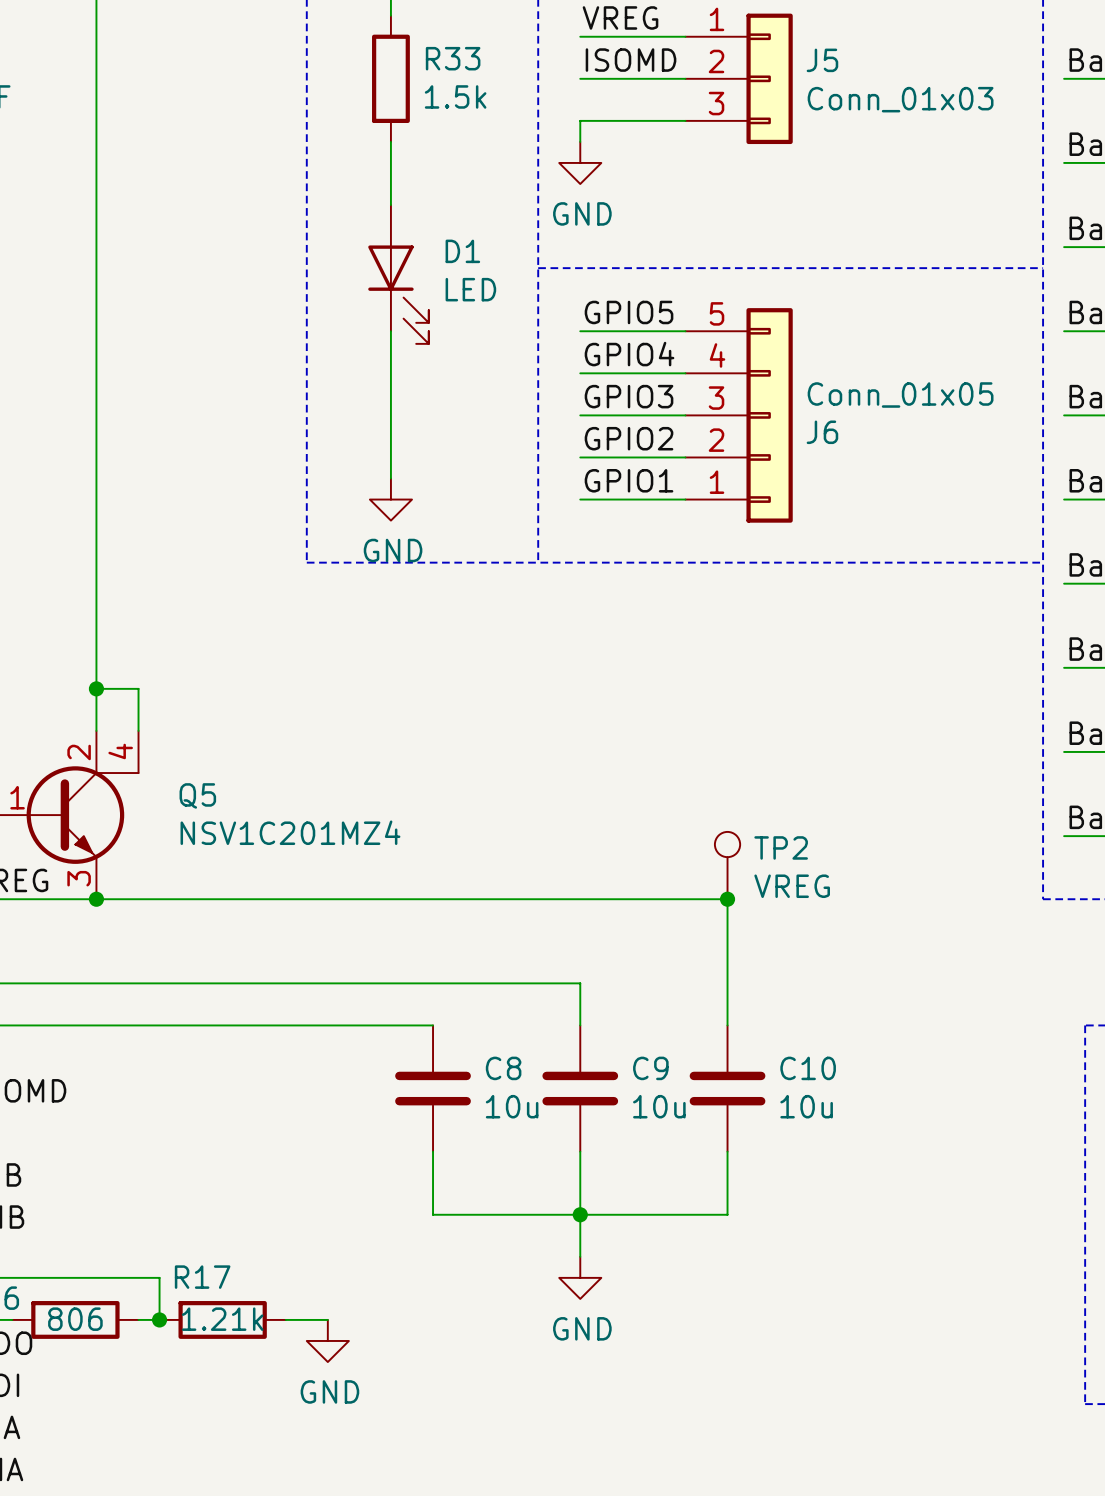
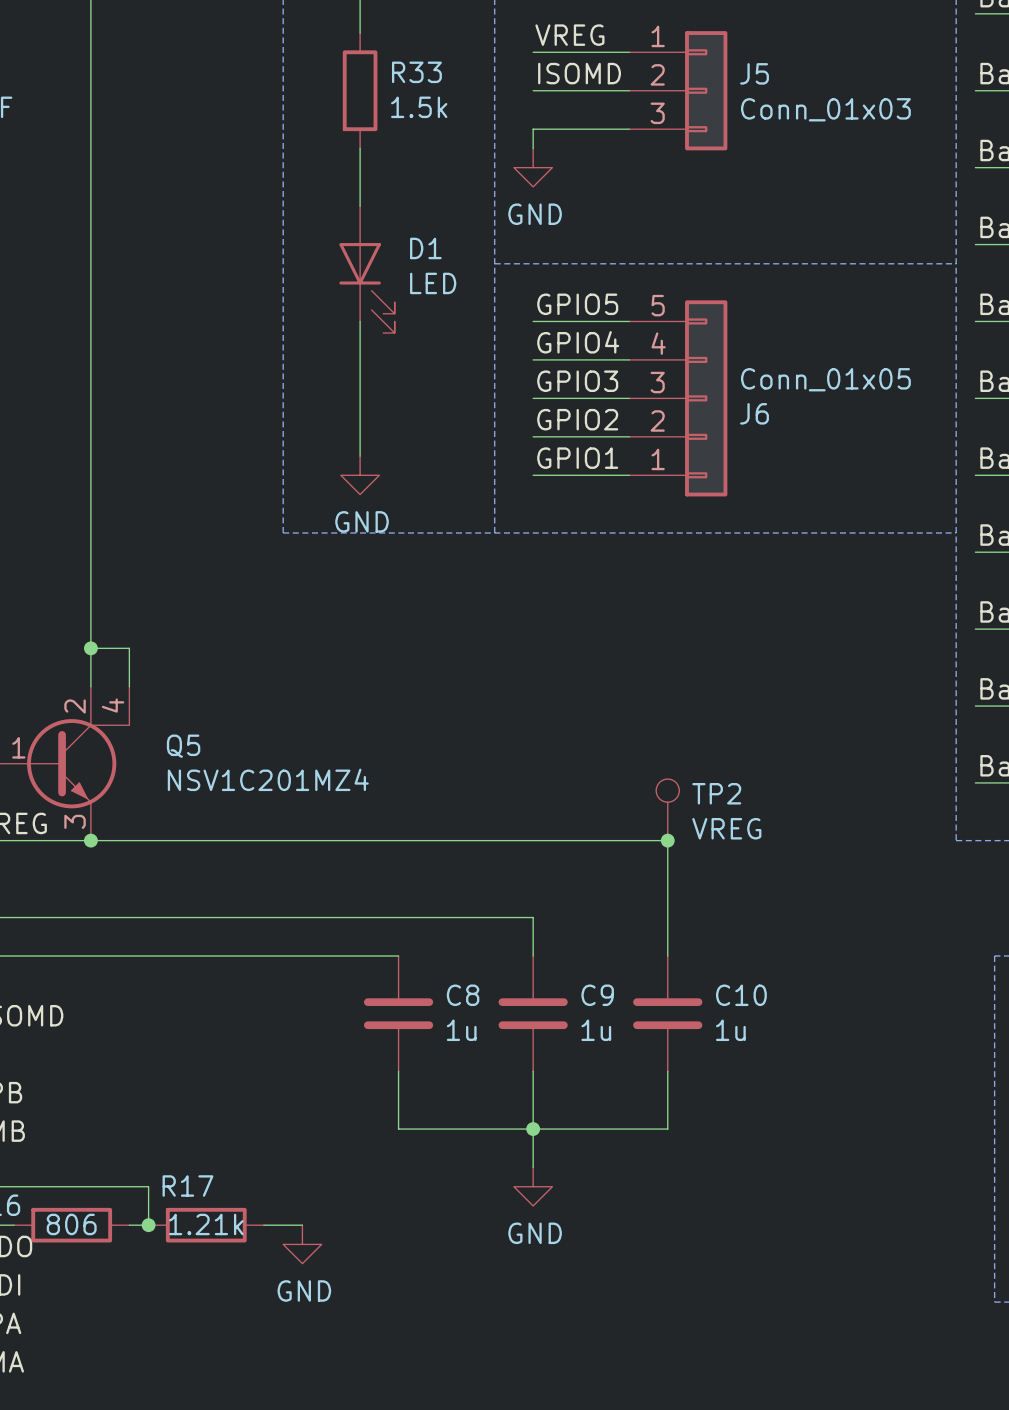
C8 value: 10u (512, 1106) -> 1u (461, 1030)
C9 value: 10u (659, 1106) -> 1u (596, 1030)
C10 value: 10u (806, 1106) -> 1u (730, 1030)

